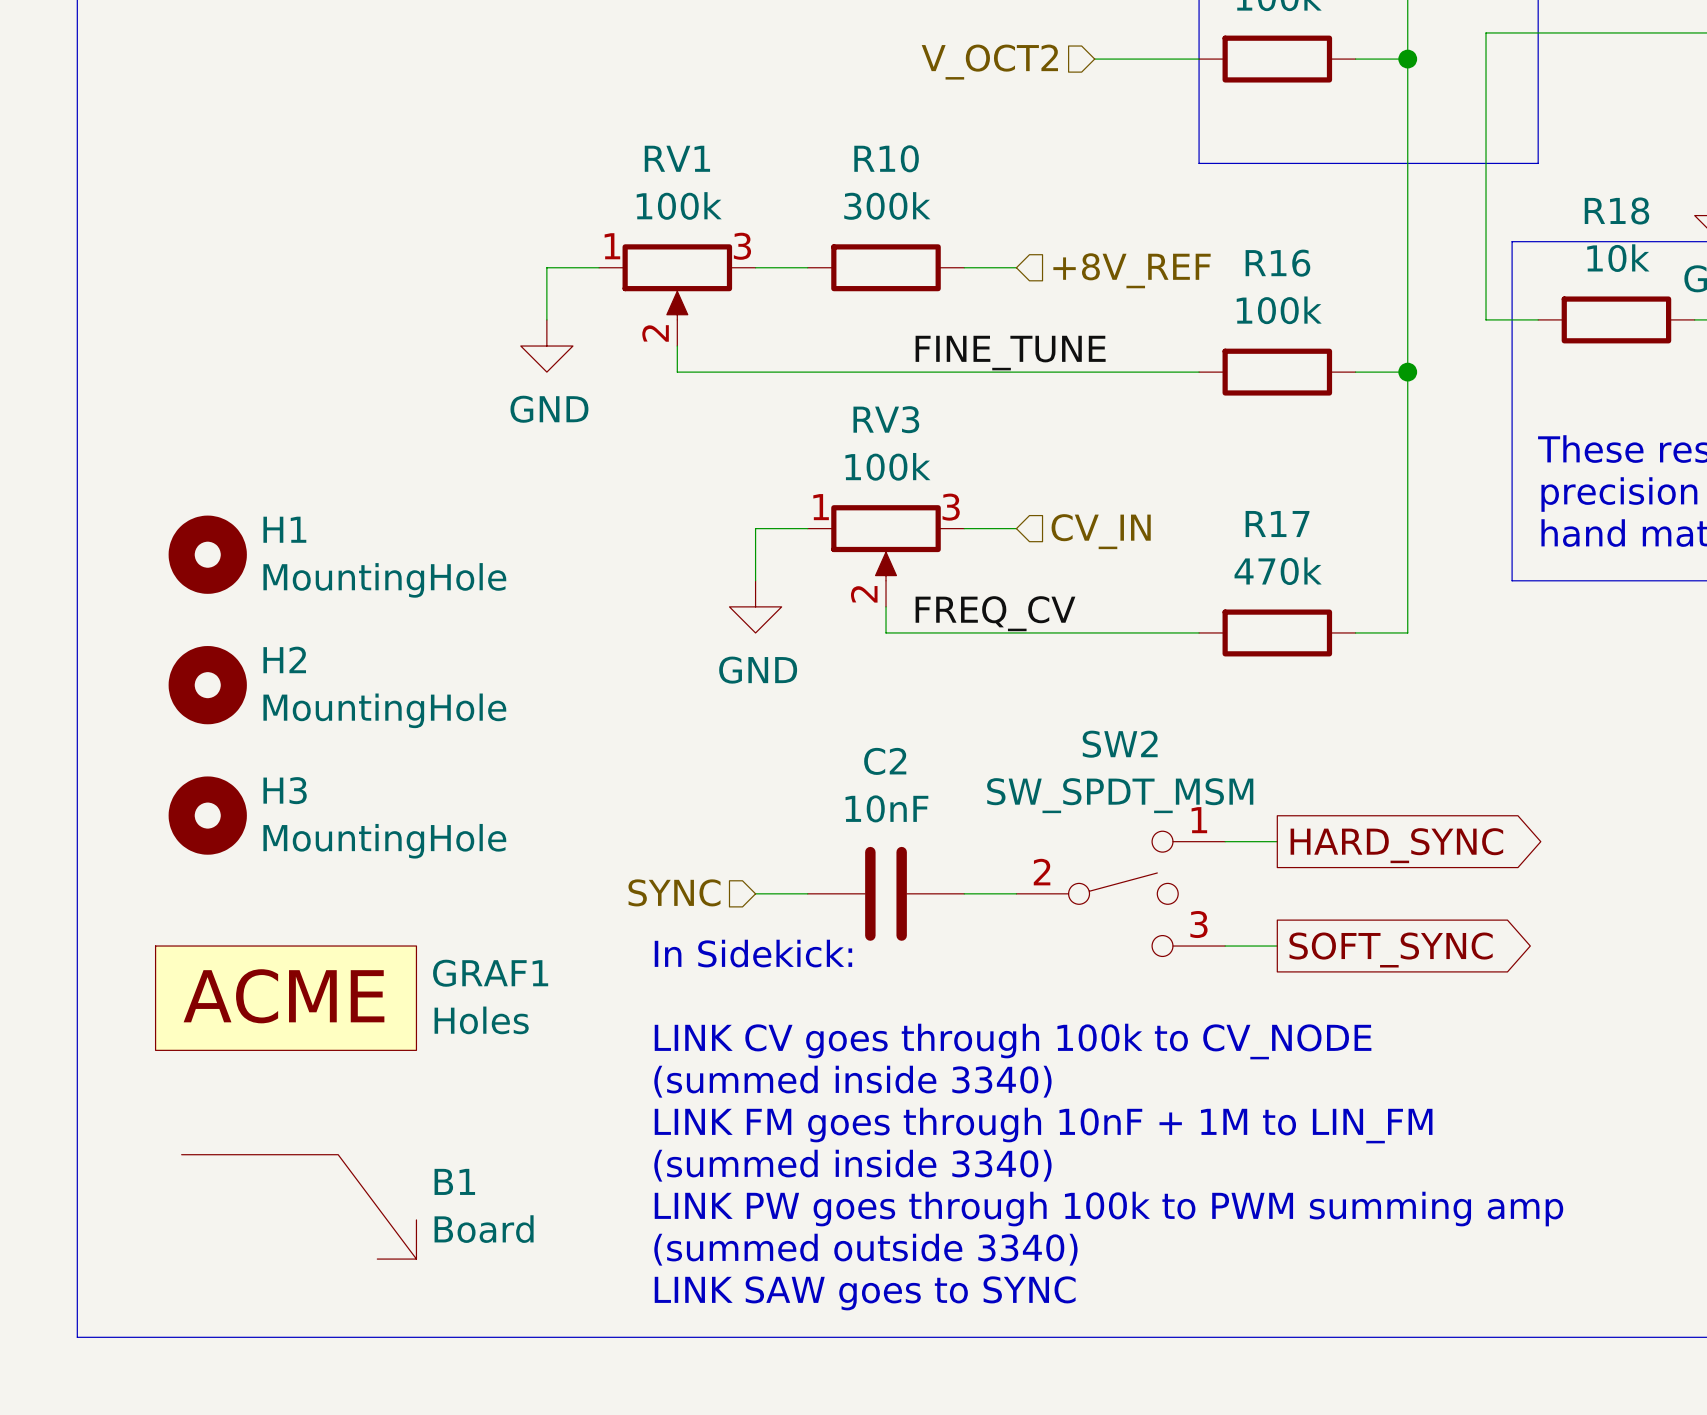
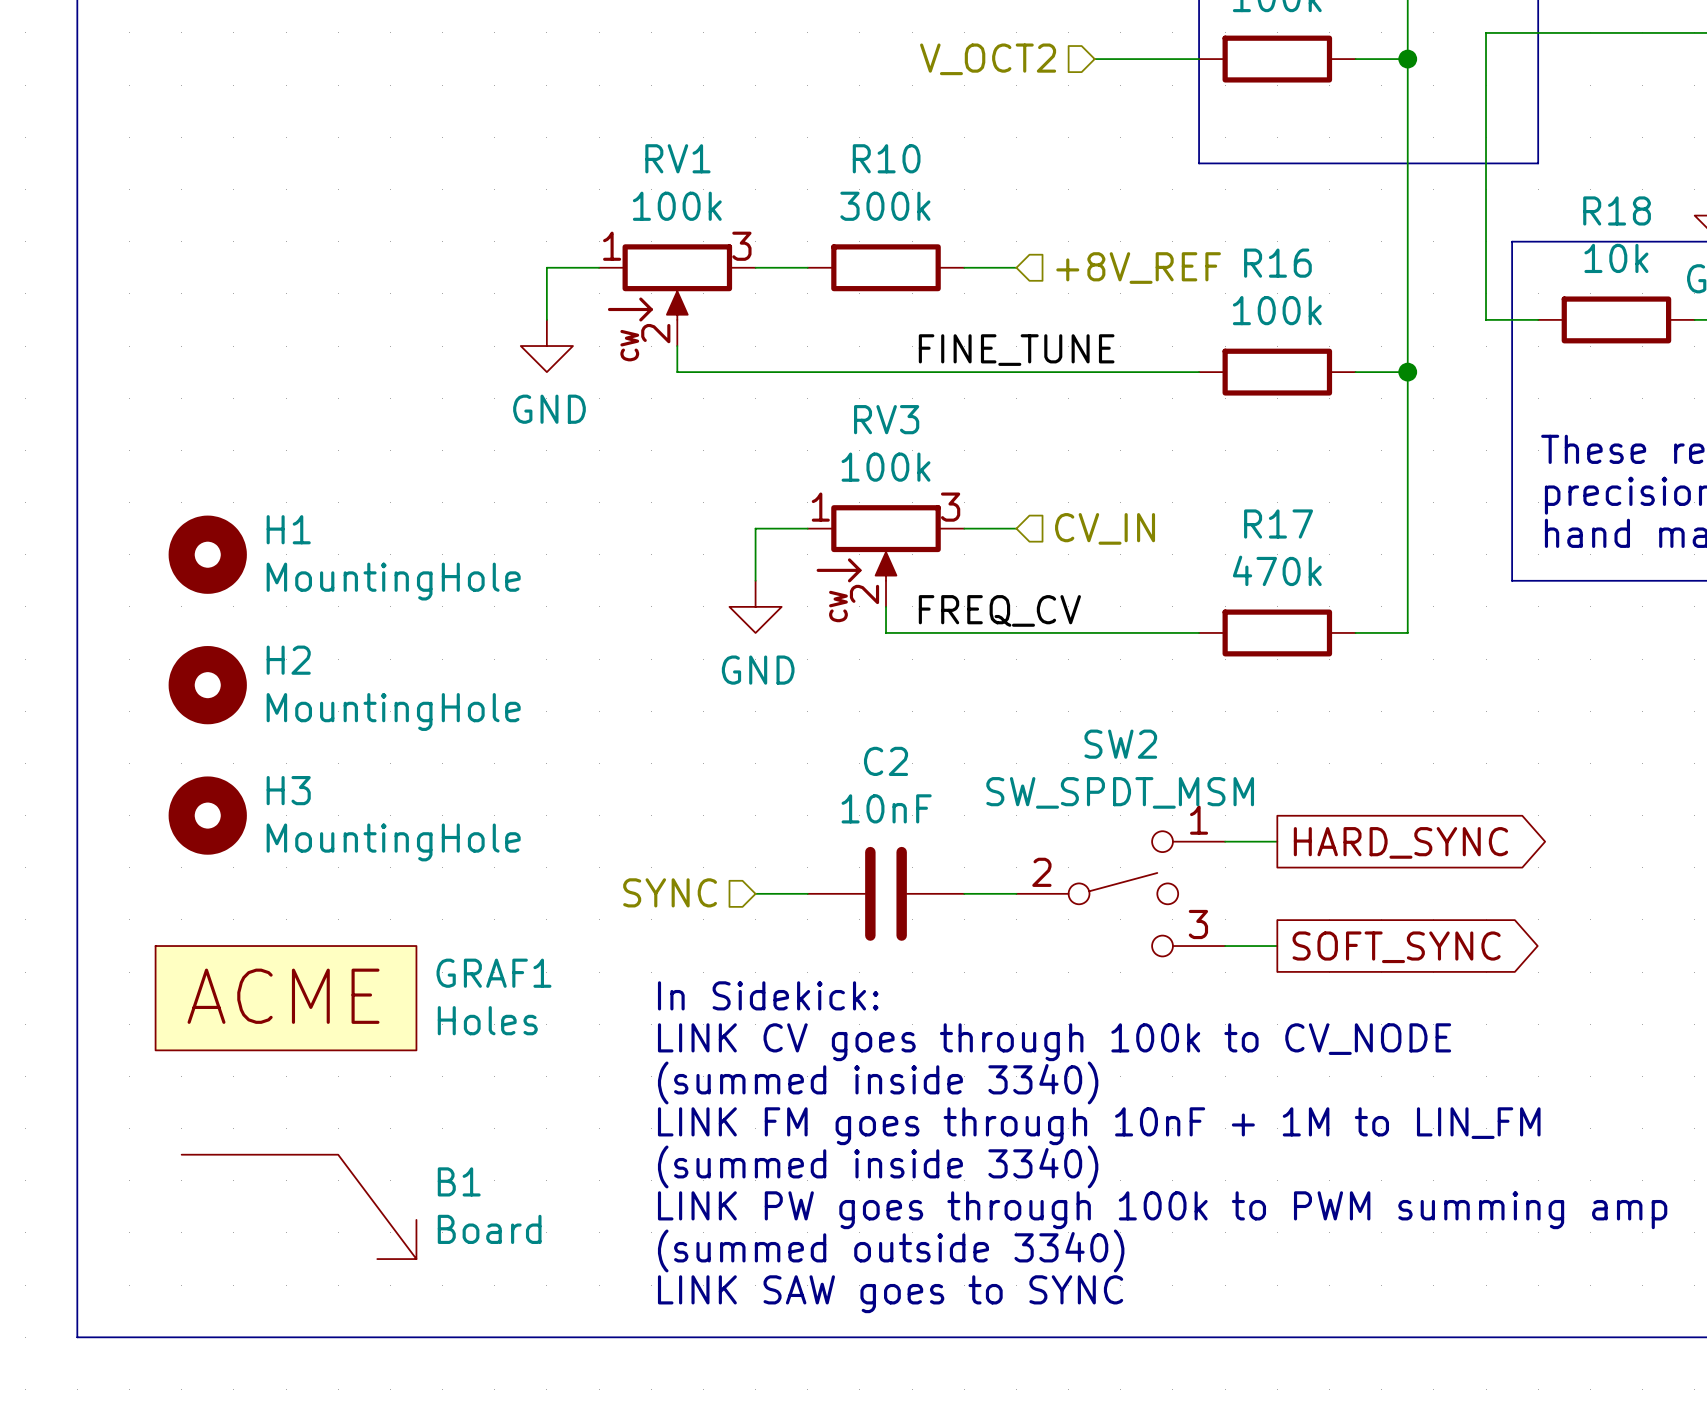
RV1 symbol: [599, 244, 756, 347] -> [599, 244, 756, 347]
RV3 symbol: [807, 505, 965, 607] -> [807, 505, 965, 607]
text position: In Sidekick: (753, 953) -> In Sidekick: (768, 995)

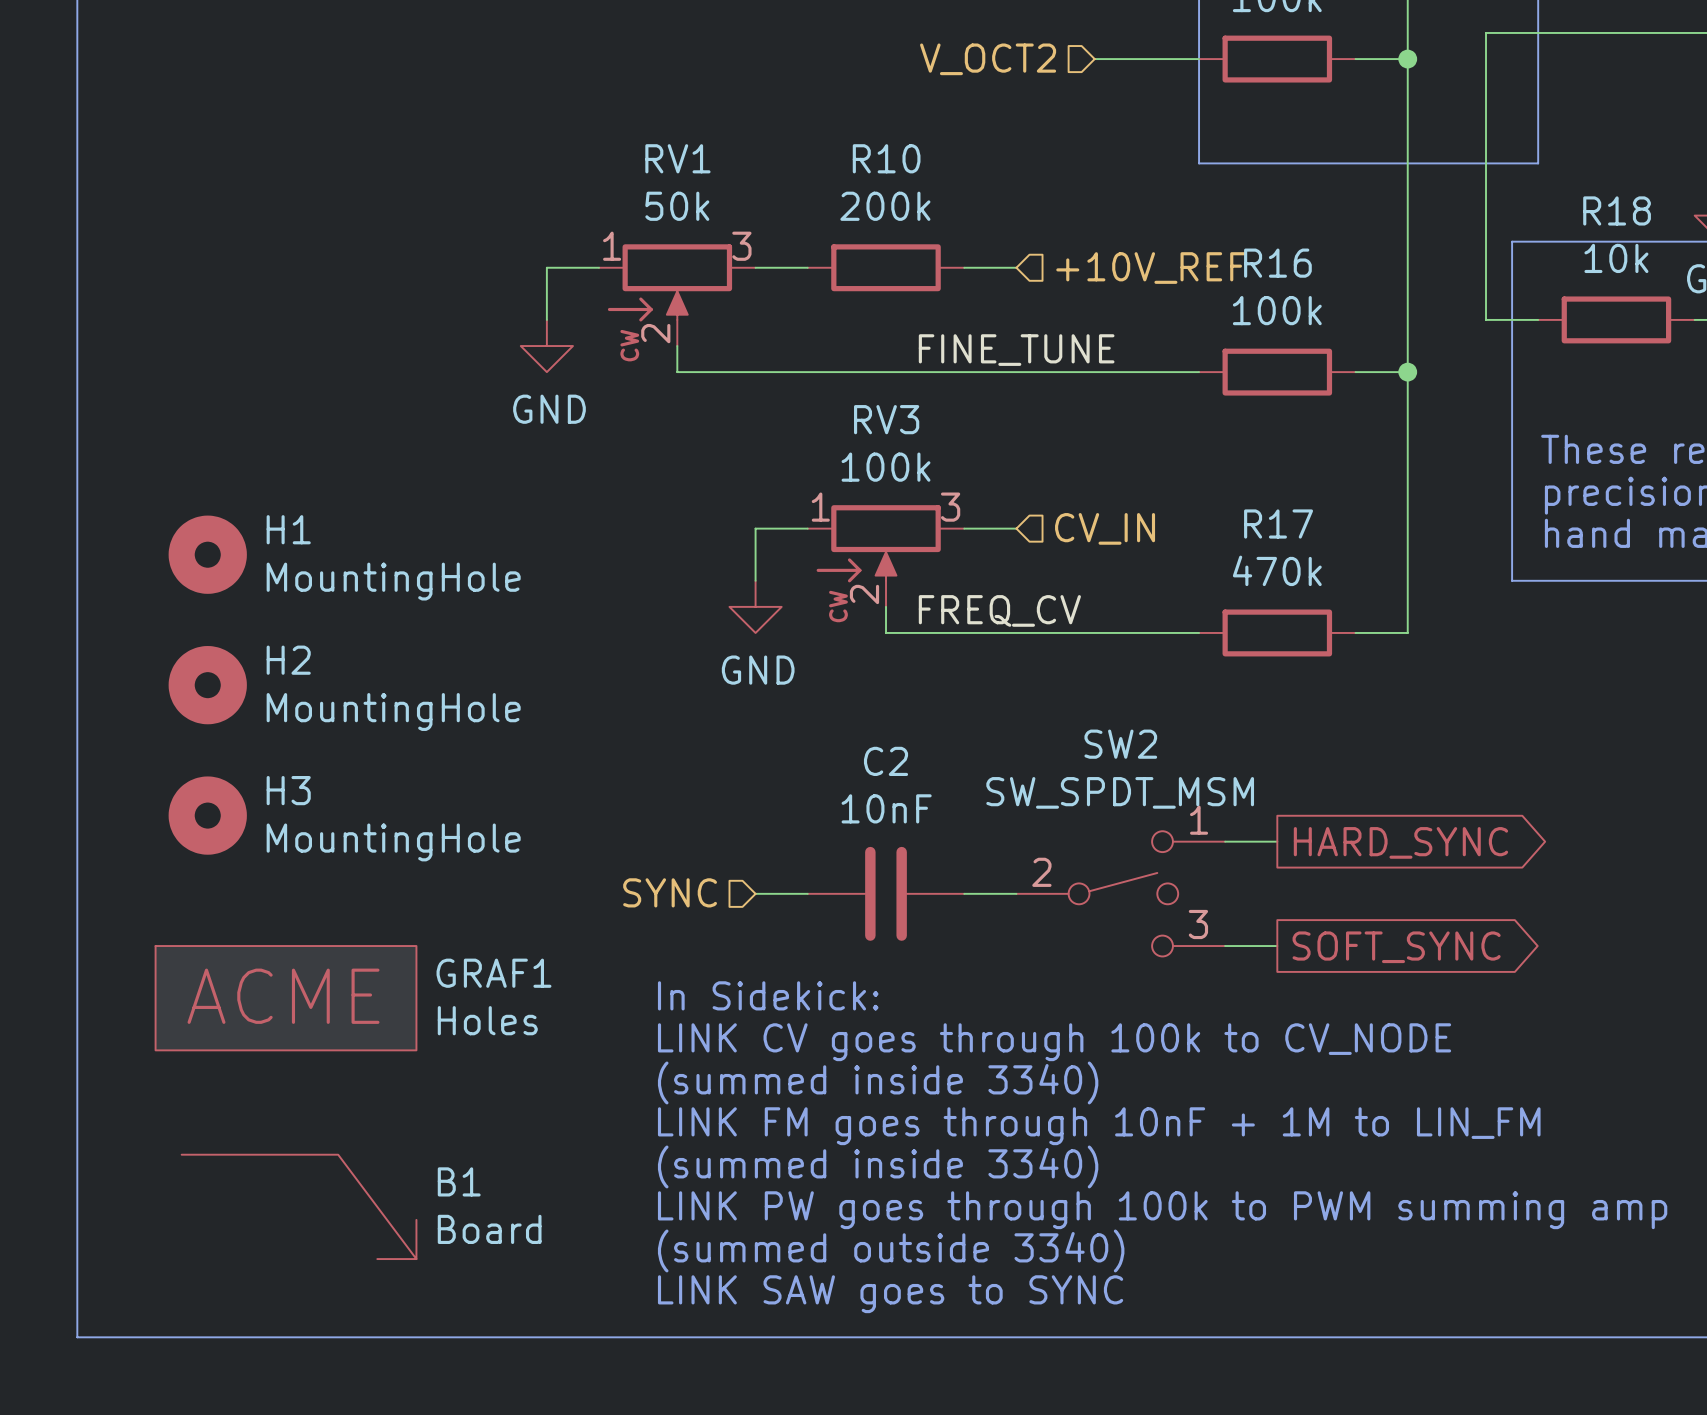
RV1 value: 100k (677, 206) -> 50k (677, 206)
R10 value: 300k (885, 206) -> 200k (885, 206)
hierarchical label: +8V_REF (1138, 268) -> +10V_REF (1151, 268)

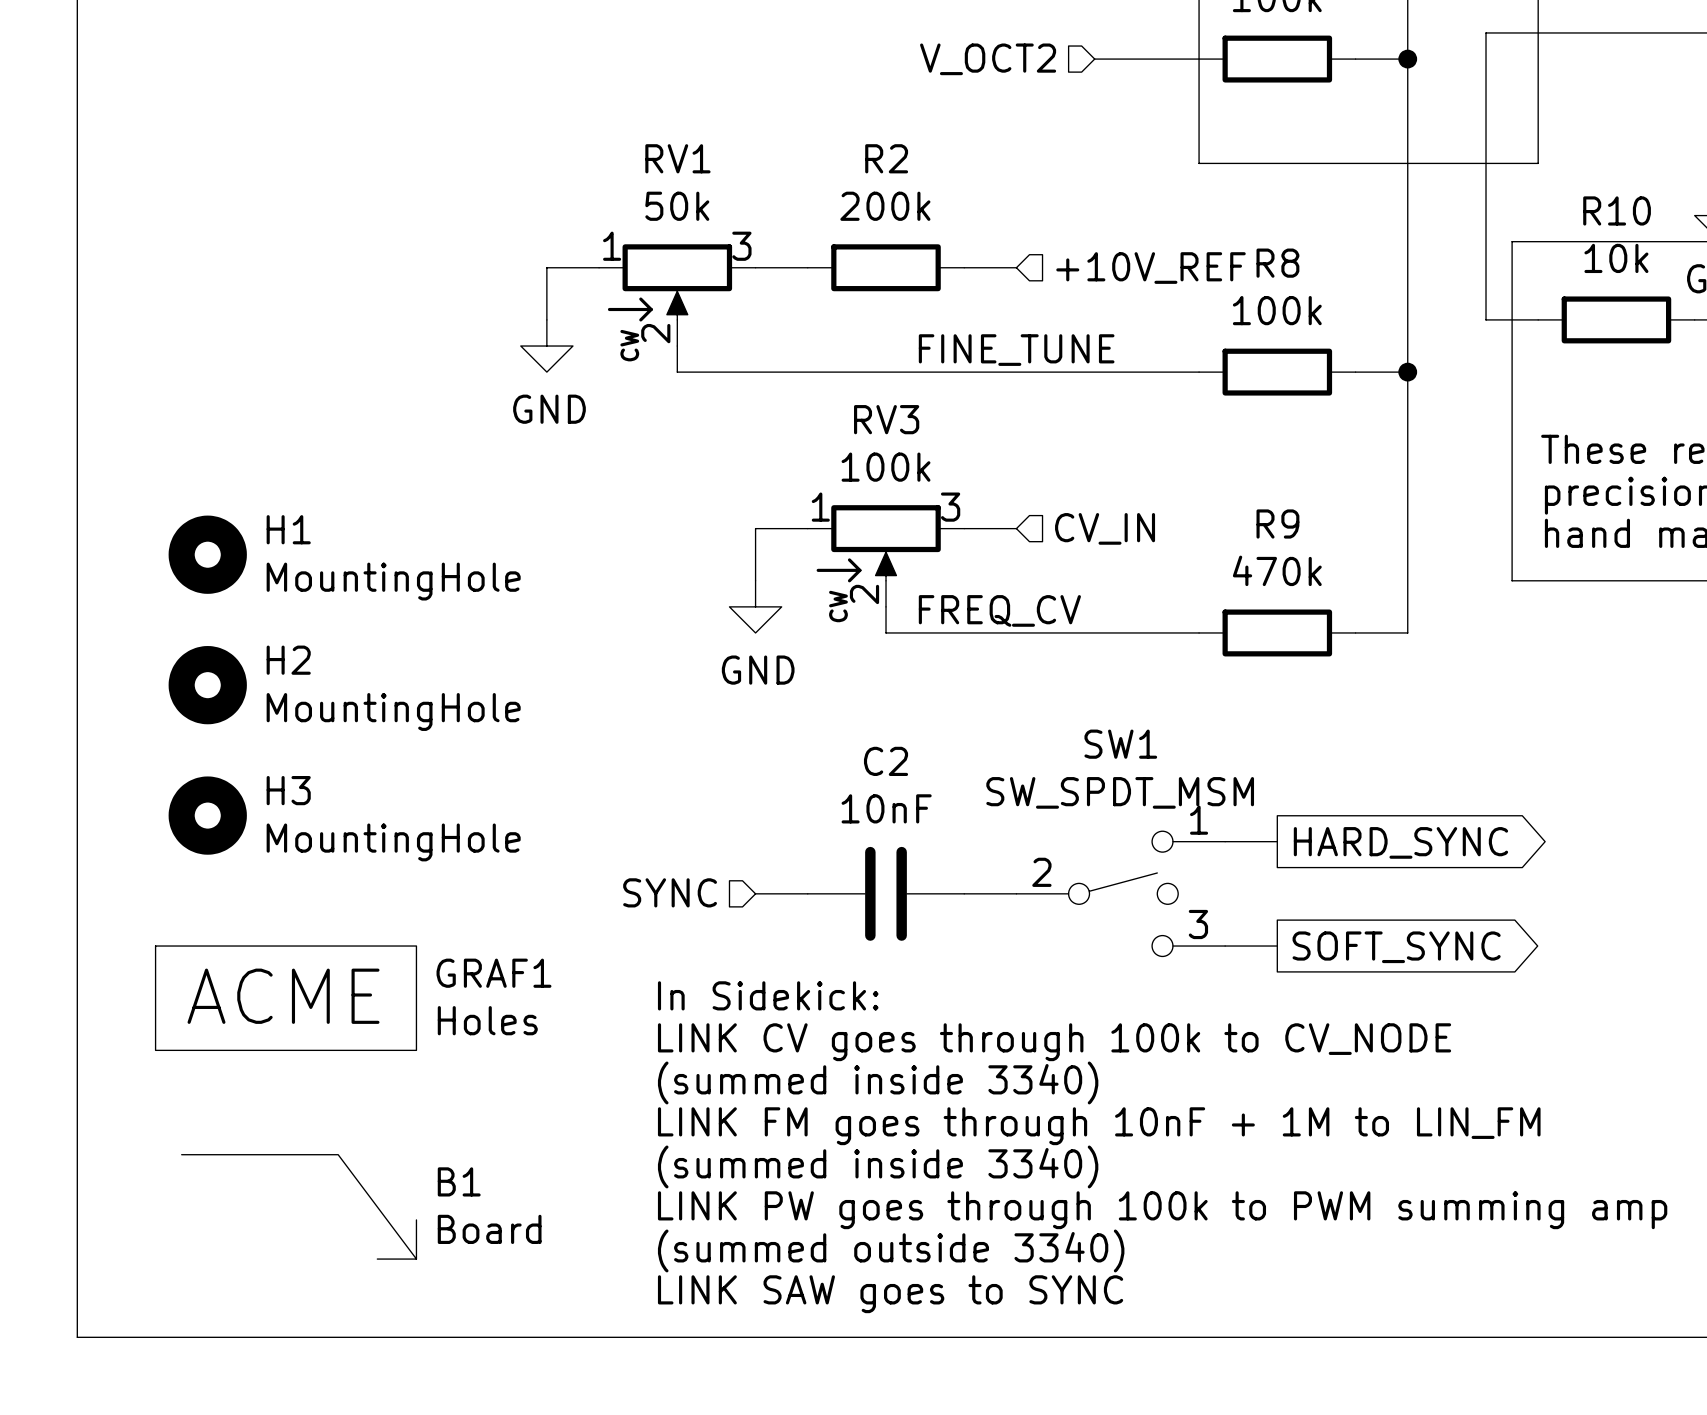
R10 name: R10 (886, 158) -> R2 (886, 158)
R18 name: R18 (1617, 210) -> R10 (1617, 210)
R16 name: R16 (1277, 263) -> R8 (1277, 263)
R17 name: R17 (1278, 524) -> R9 (1277, 524)
SW2 name: SW2 (1120, 744) -> SW1 (1120, 744)

